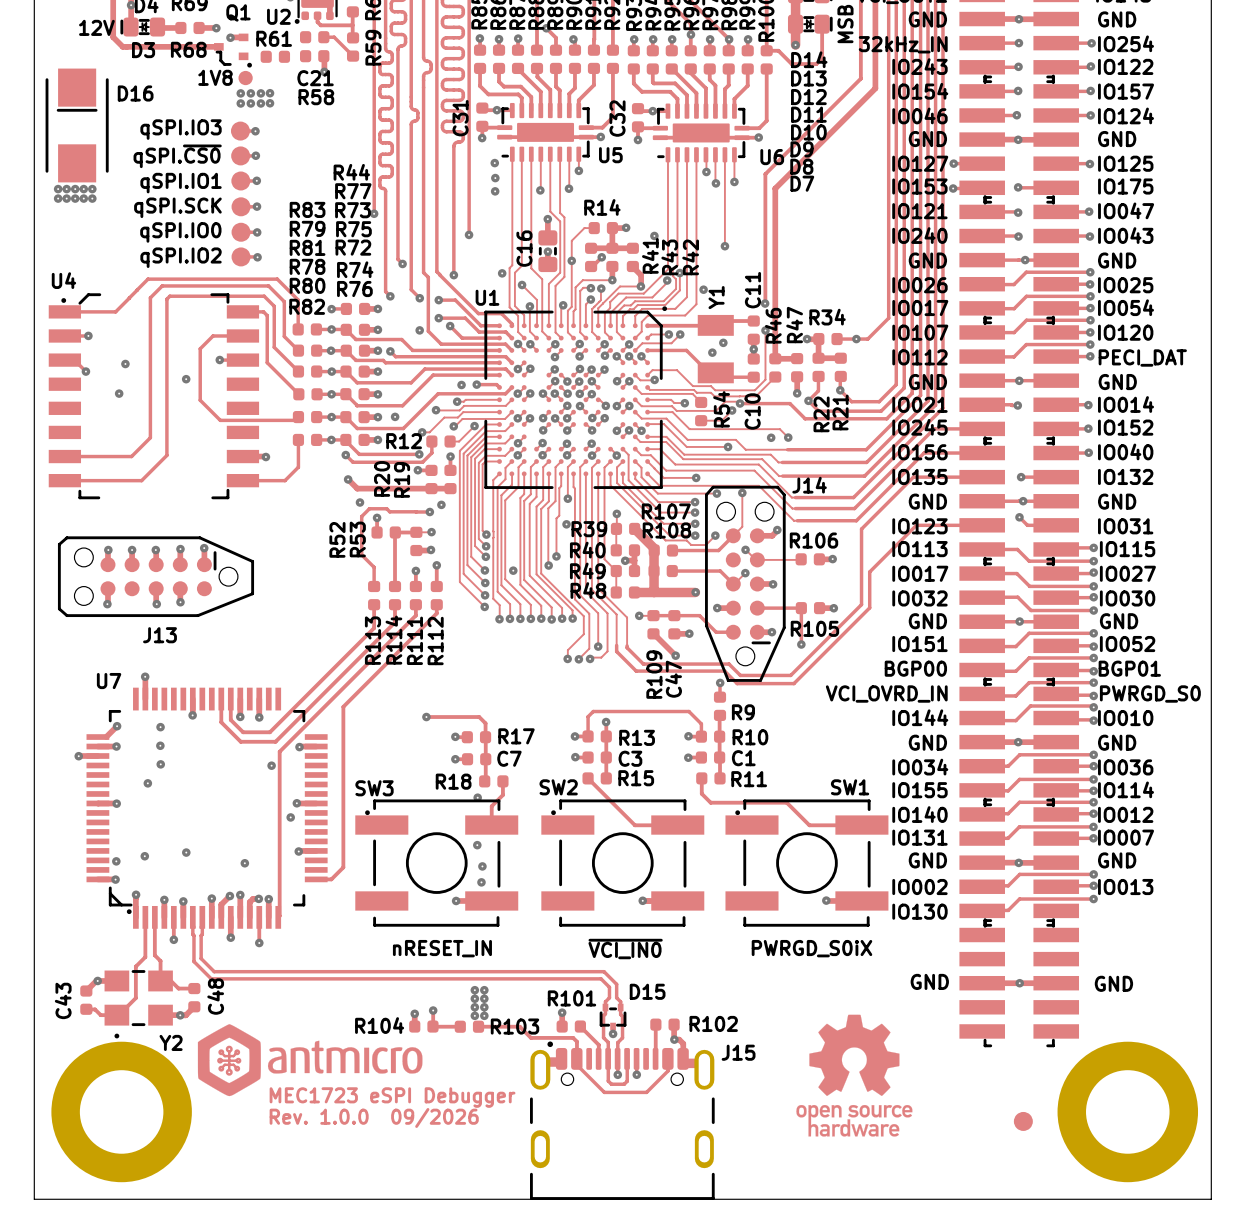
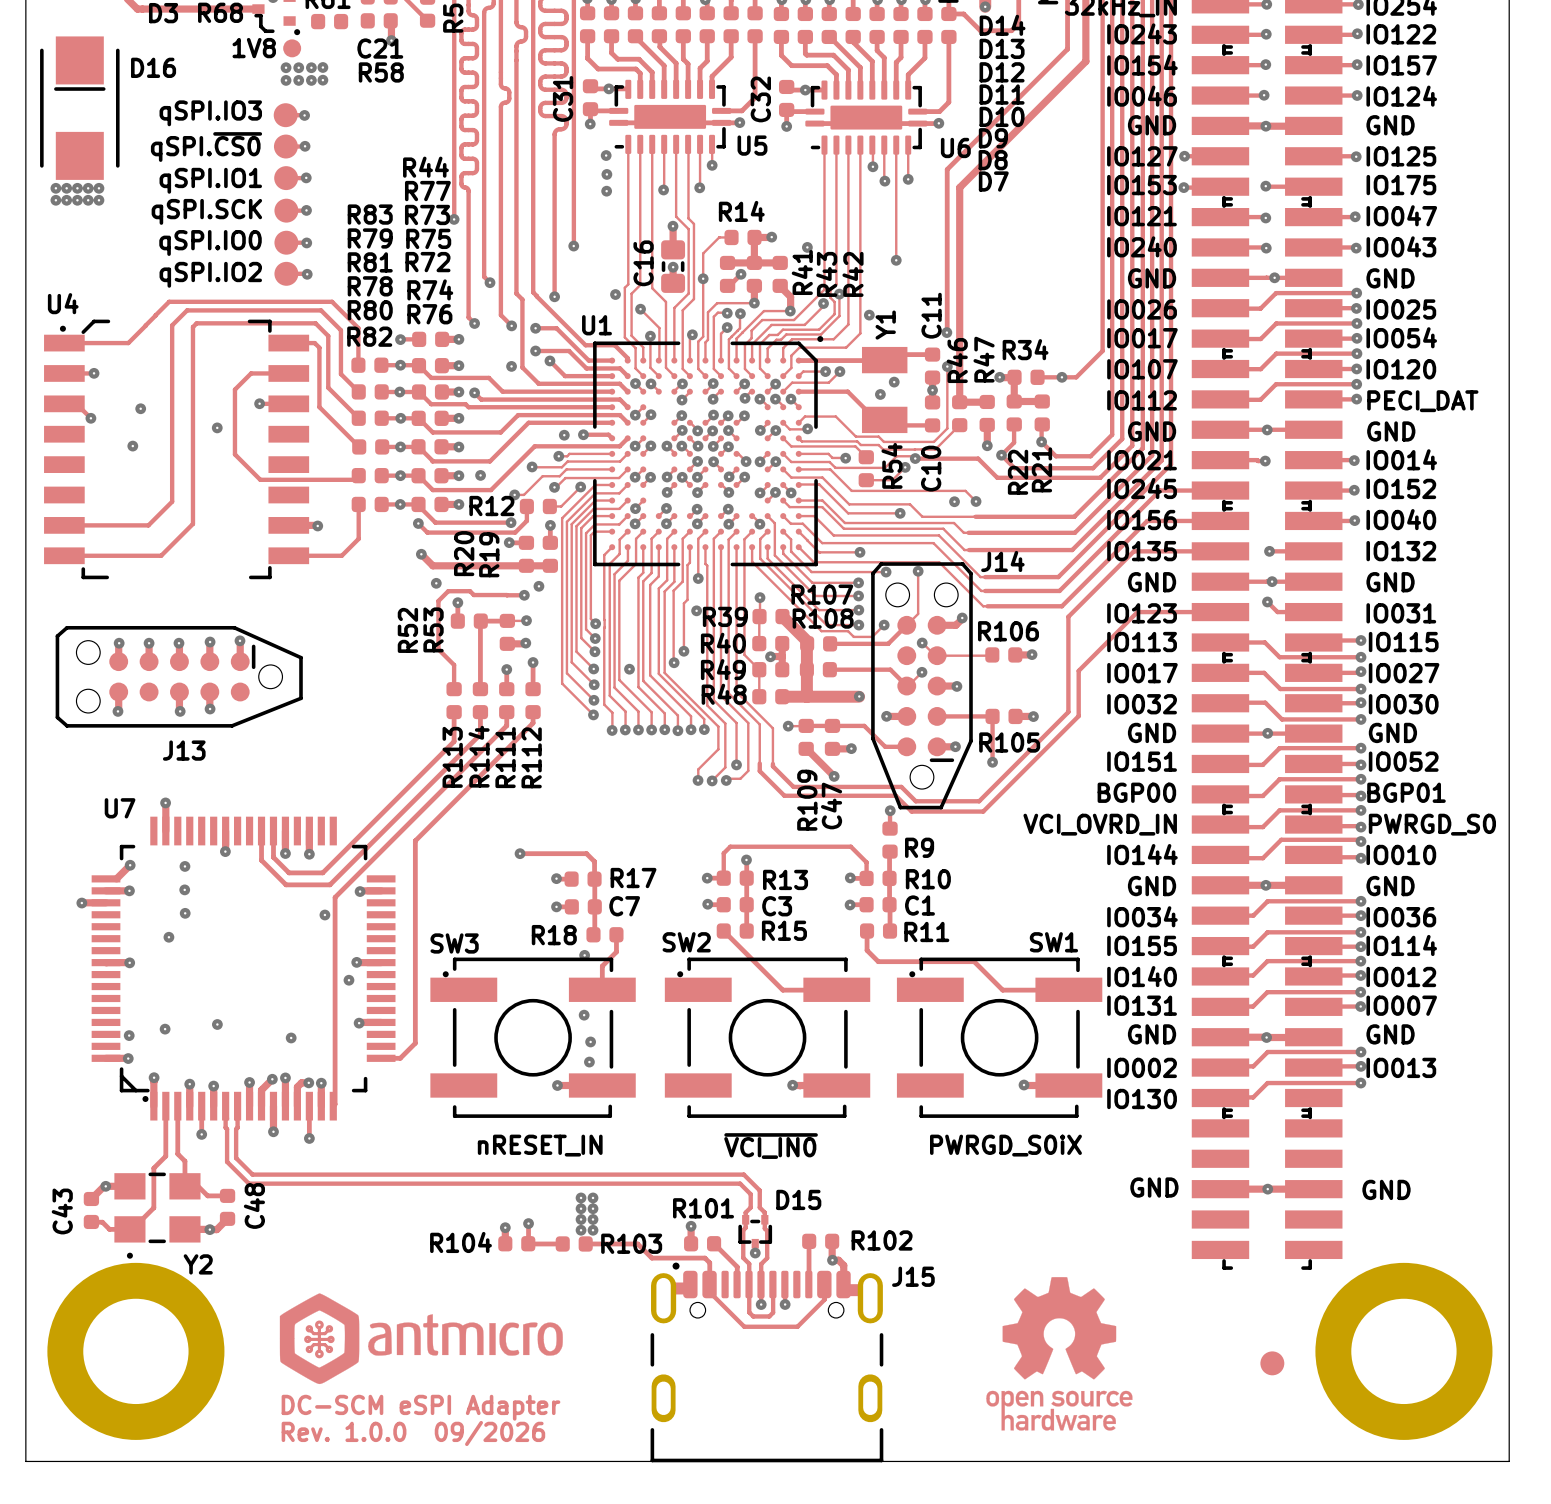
drawing position: (310, 1060) -> (421, 1338)
drawing position: (854, 1075) -> (1059, 1353)
text: MEC1723 eSPI Debugger (392, 1097) -> none
text position: Rev. 1.0.0 09/2026 (374, 1117) -> Rev. 1.0.0 09/2026 (413, 1433)
text: none -> DC-SCM eSPI Adapter (420, 1407)

